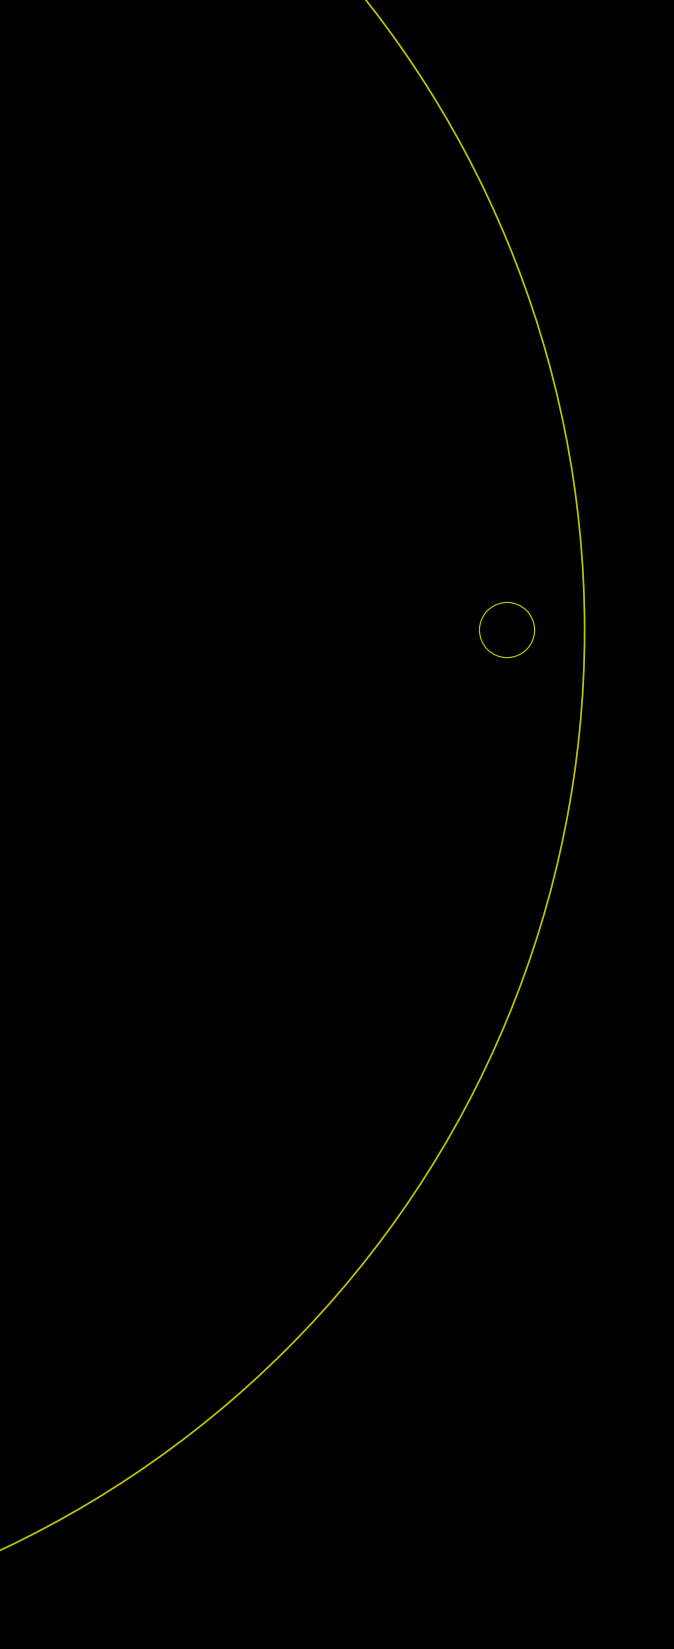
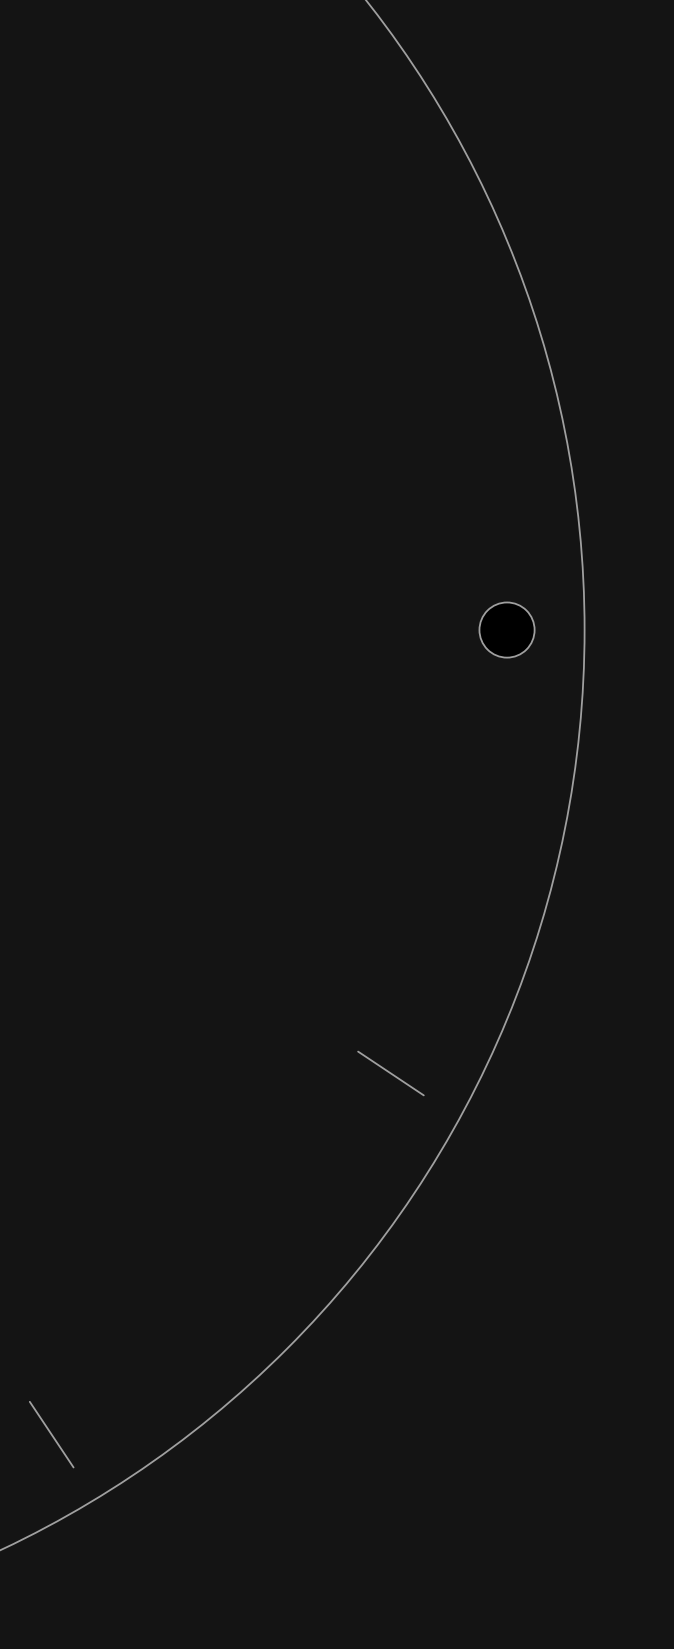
board edge: none -> (358, 1051) (423, 1095)
board edge: none -> (29, 1401) (73, 1467)

